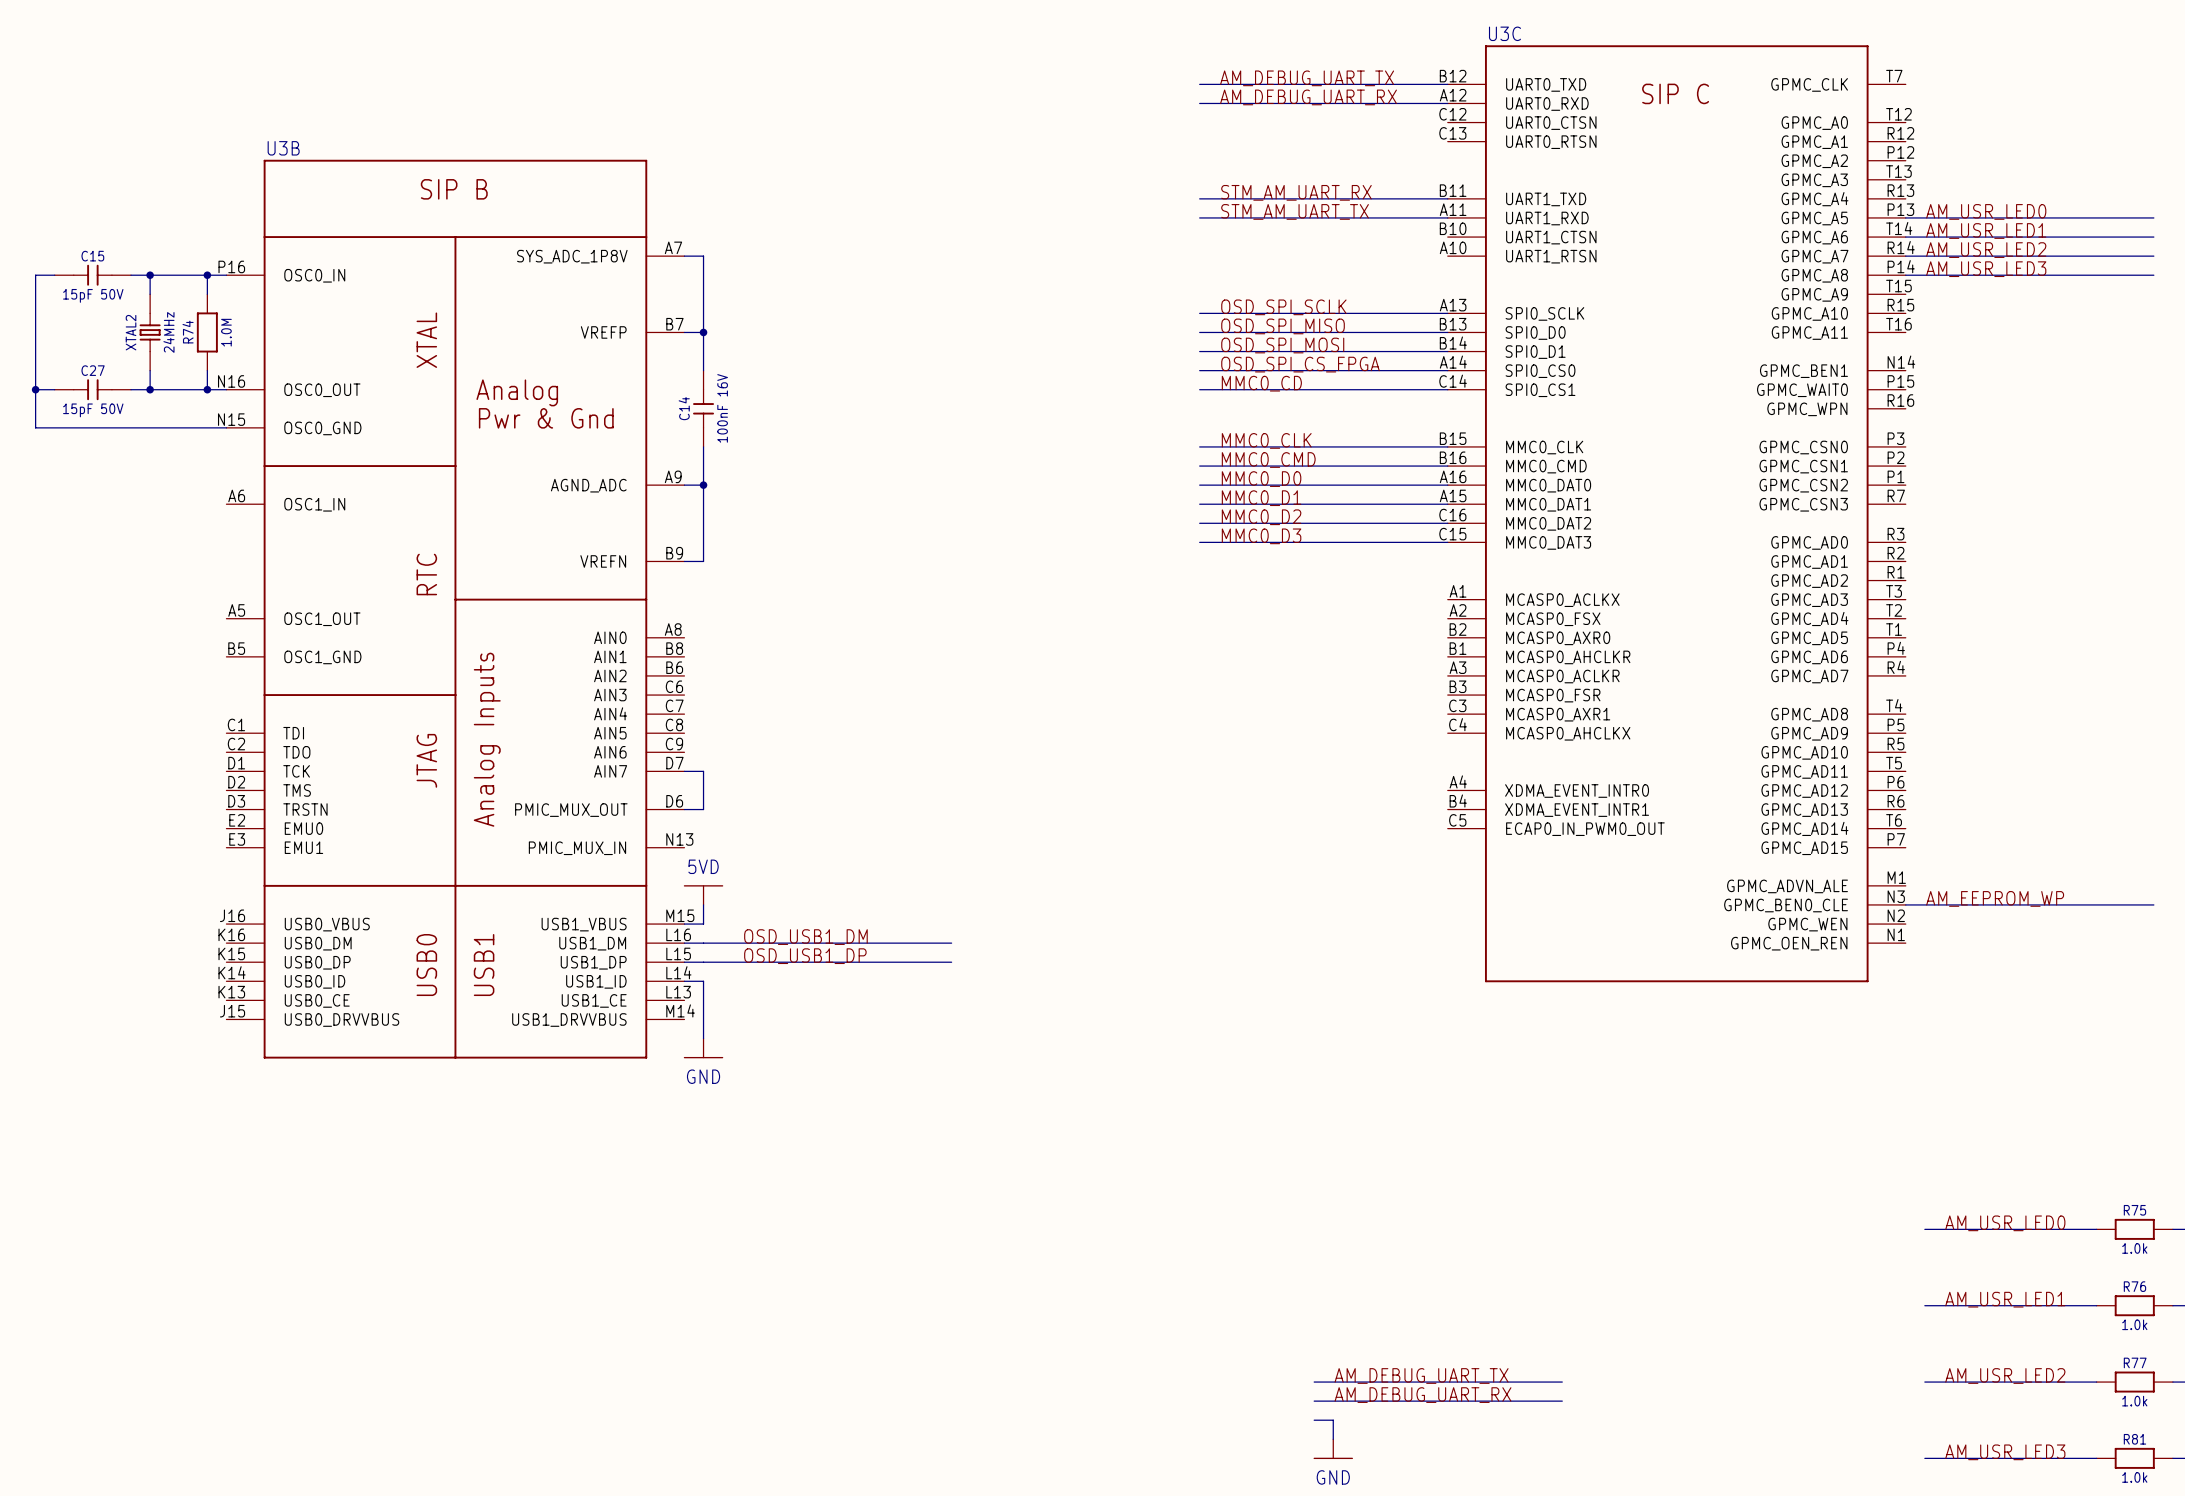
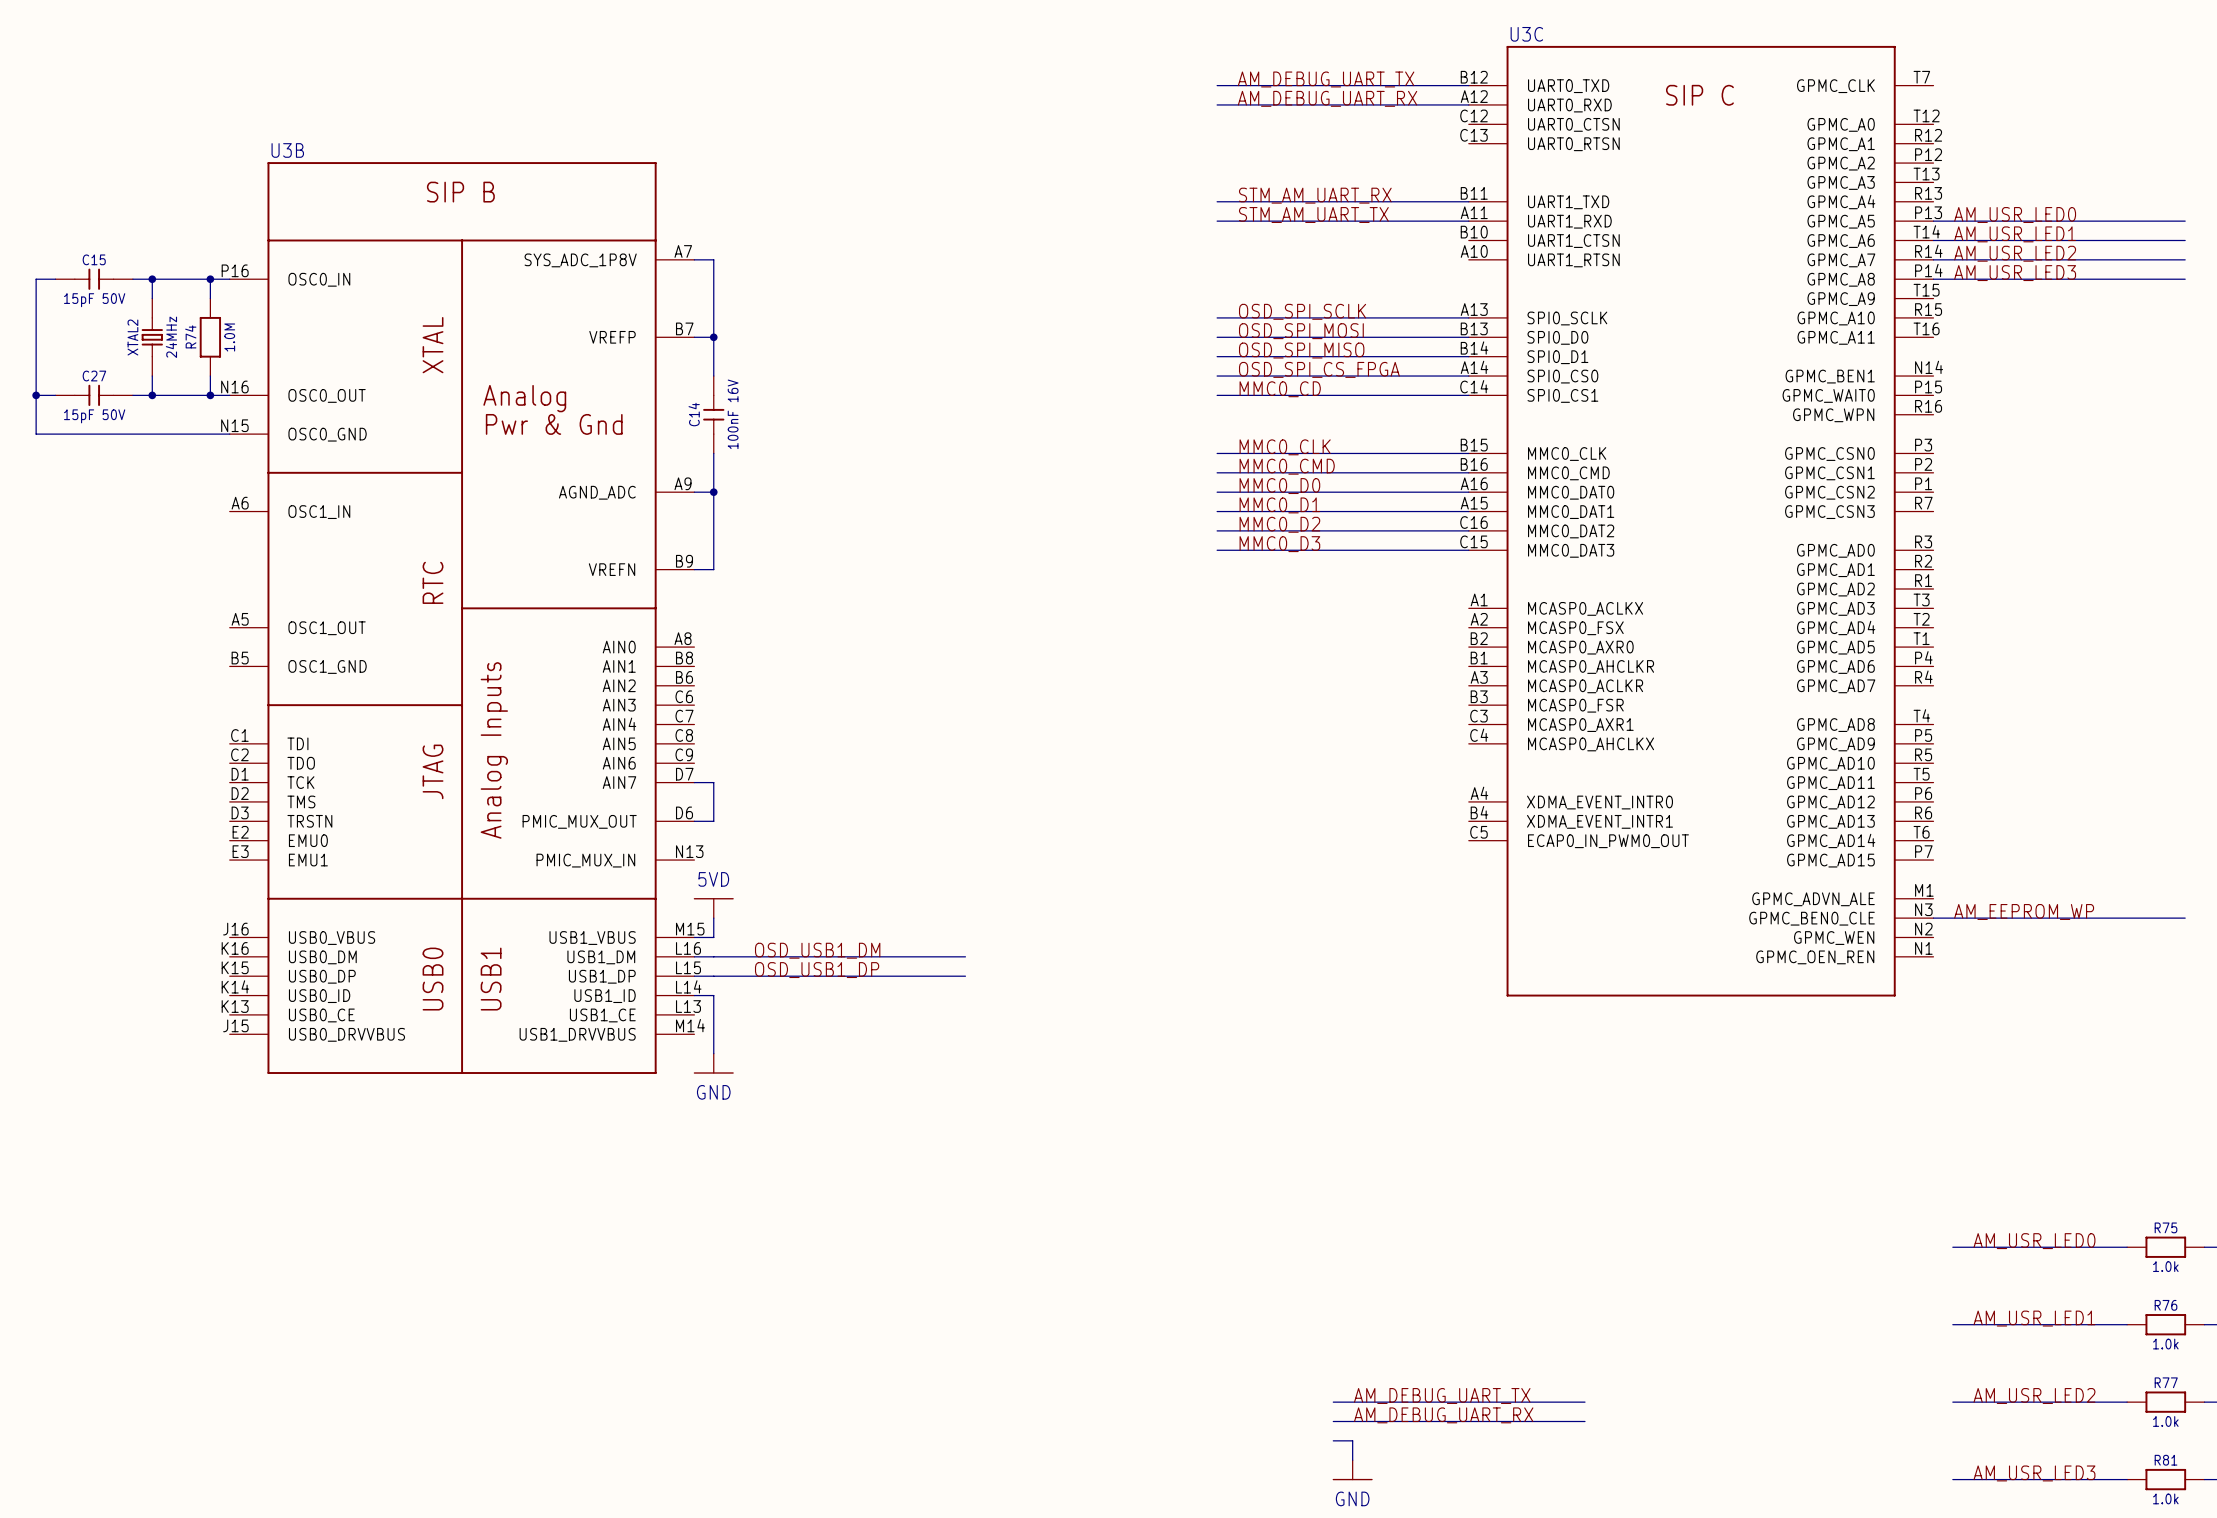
label: OSD_SPI_MISO (1283, 326) -> OSD_SPI_MOSI (1301, 331)
label: OSD_SPI_MOSI (1282, 345) -> OSD_SPI_MISO (1301, 350)

